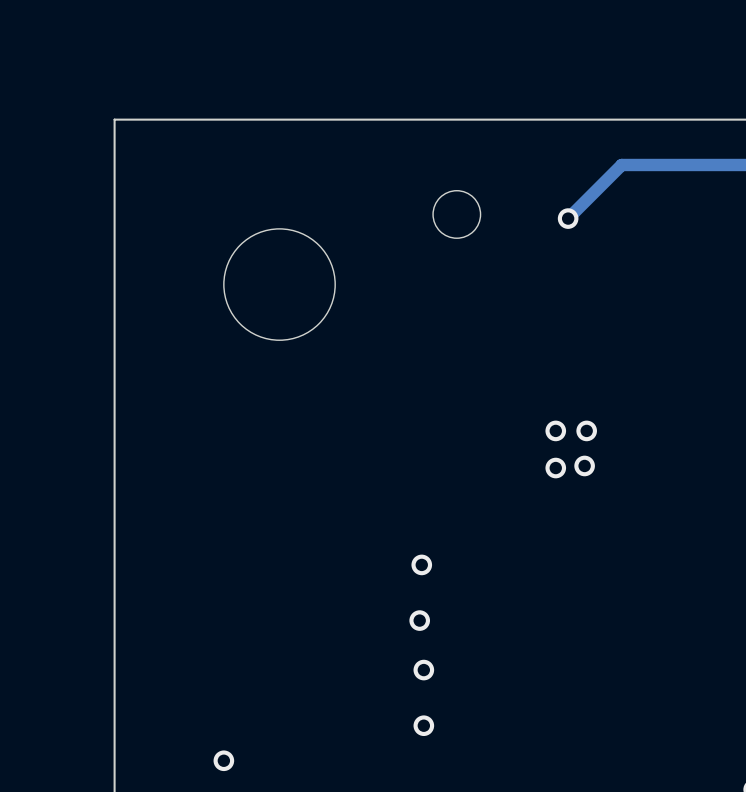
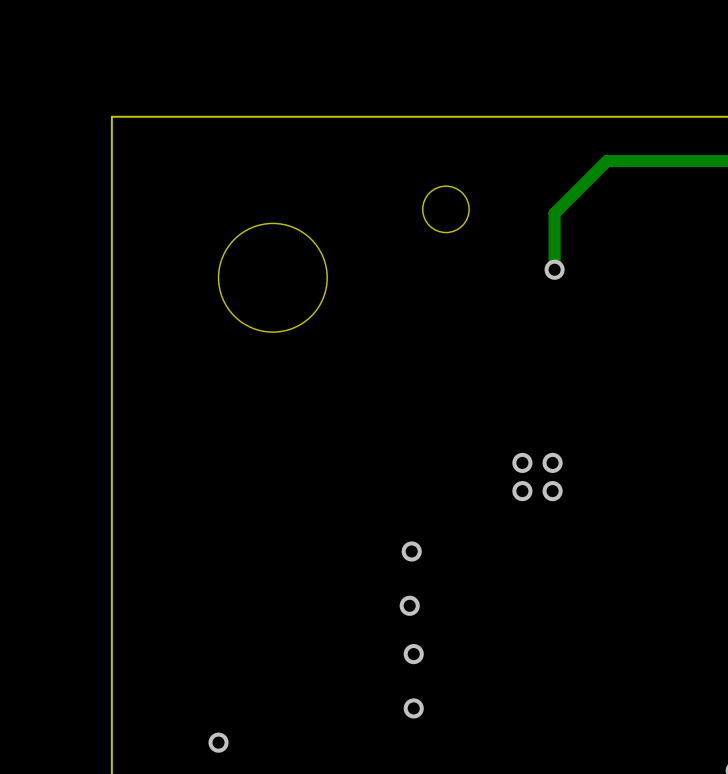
track: none -> (554, 213) (554, 269)
via position: (568, 218) -> (554, 269)
via: (555, 430) -> none
via: (586, 430) -> none
via: (584, 465) -> none
via: (555, 468) -> none
via: none -> (522, 462)
via: none -> (552, 462)
via: none -> (522, 491)
via: none -> (552, 491)

